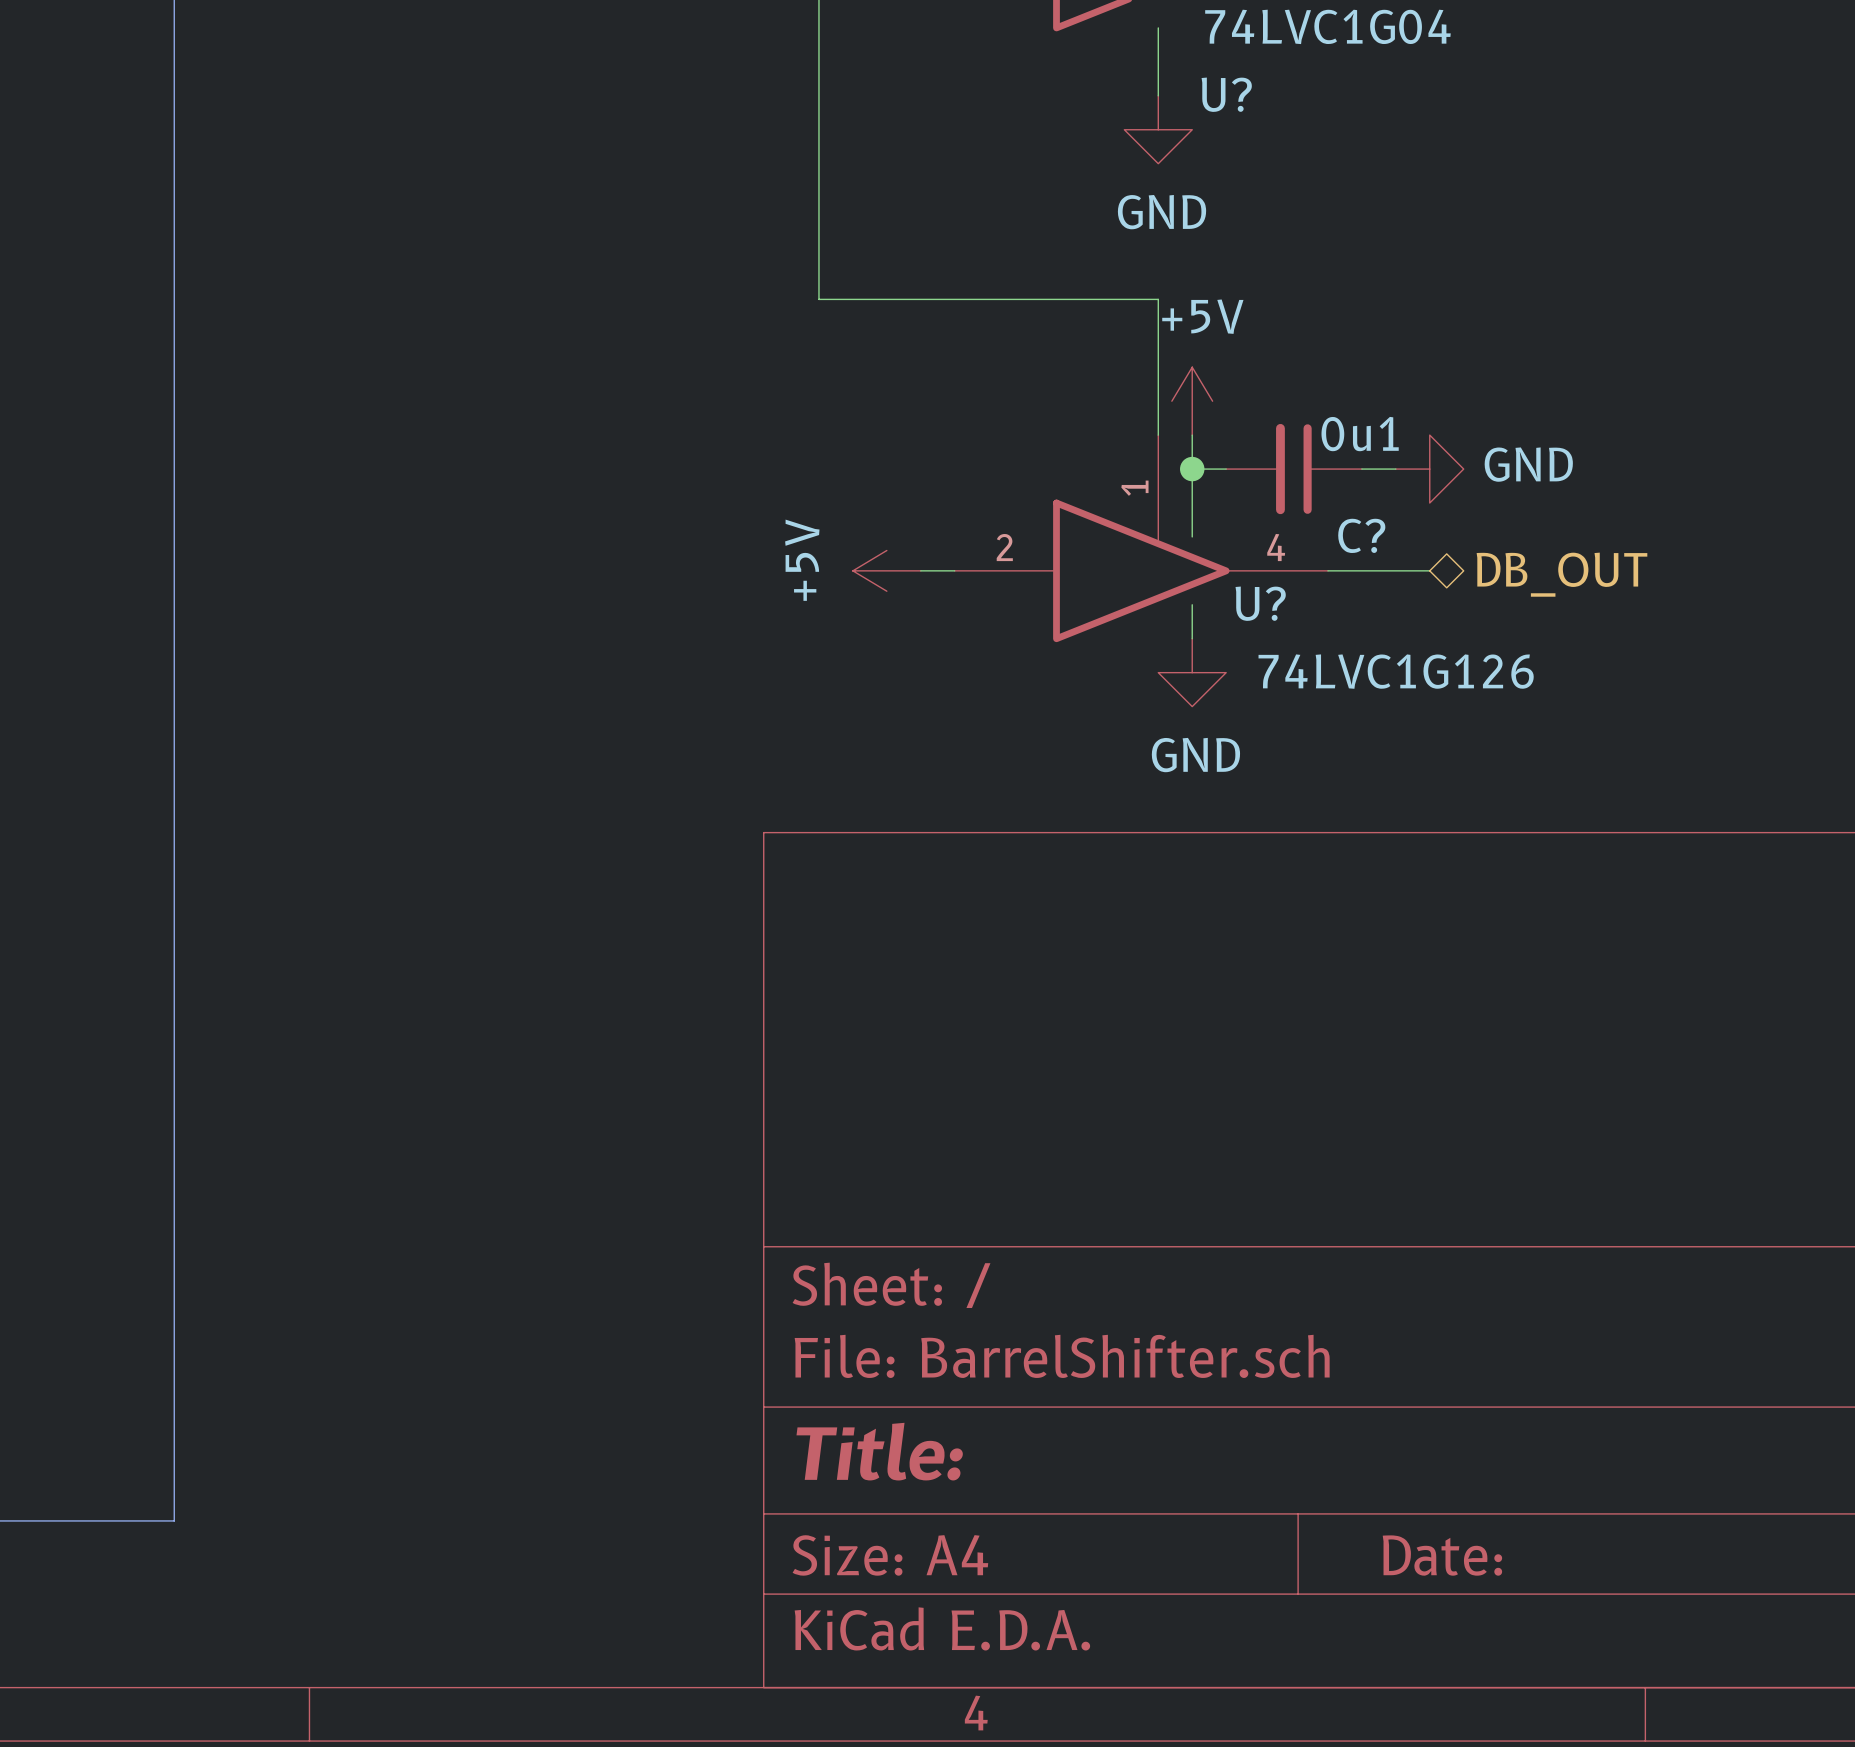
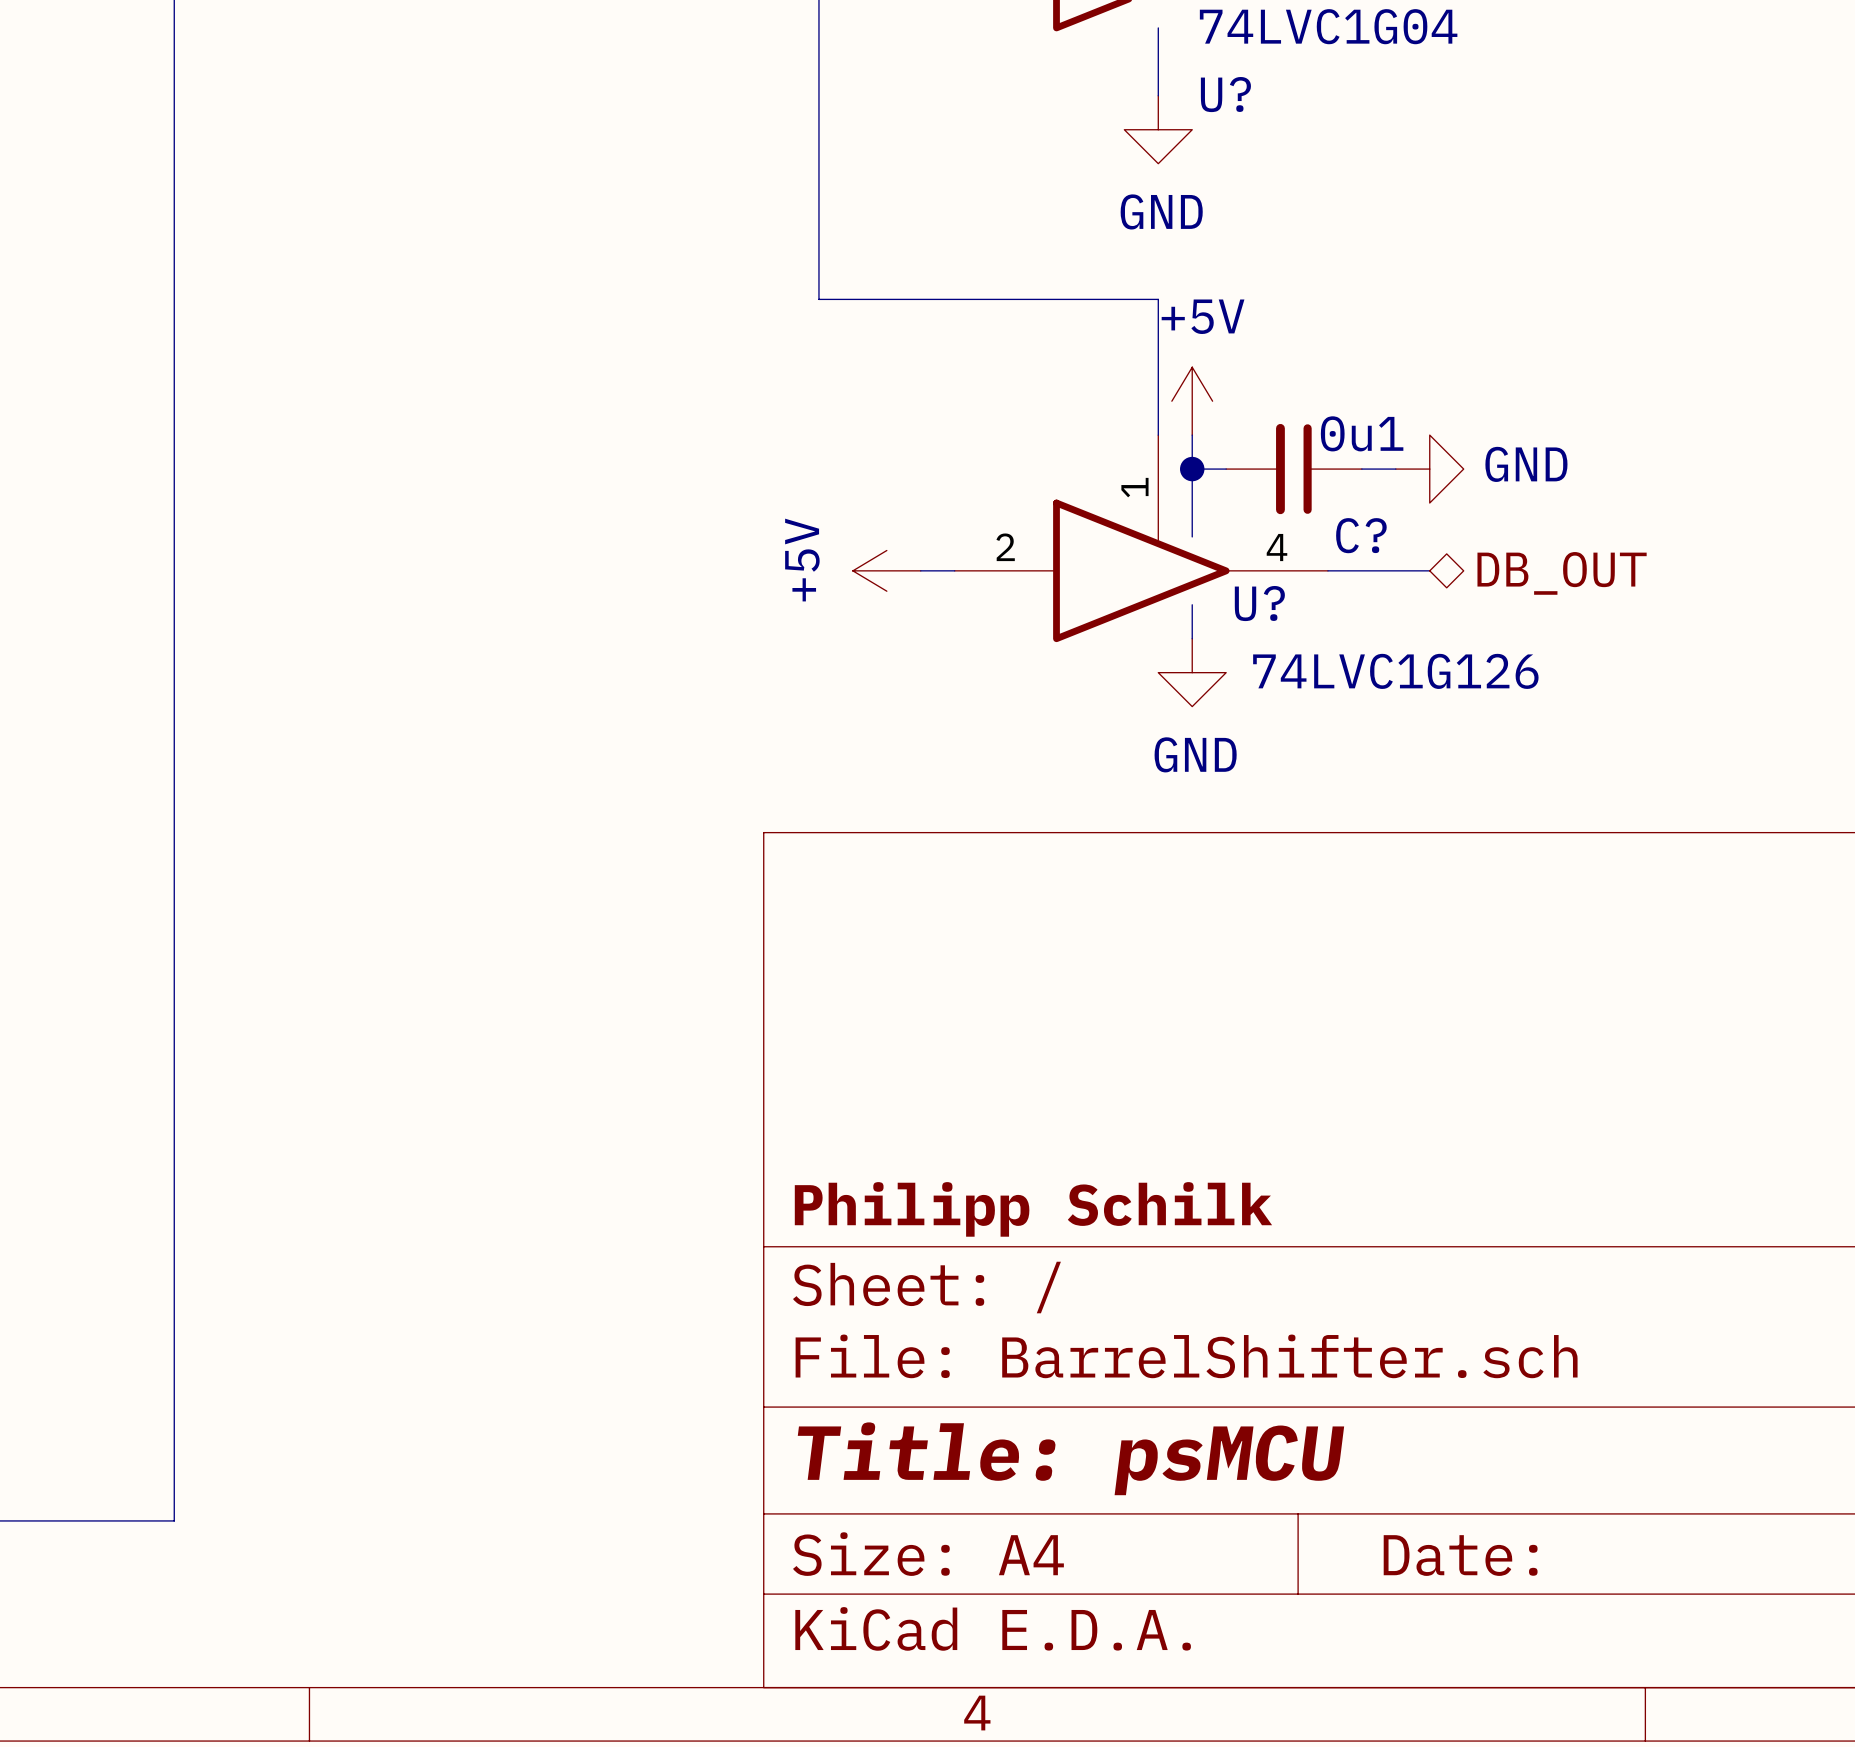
title block: none -> Philipp Schilk (1033, 1209)
title block: Title: (879, 1451) -> Title: psMCU (1070, 1458)

